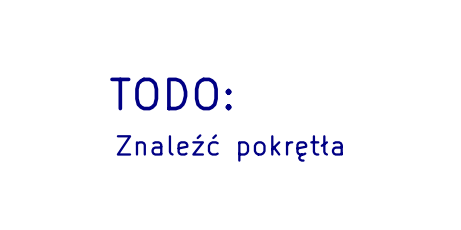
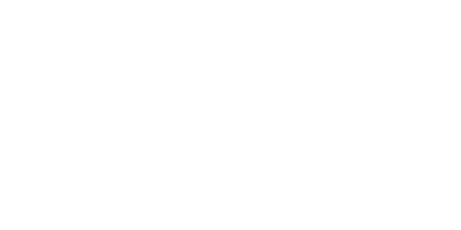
text: TODO: (170, 93) -> none
text: Znaleźć pokrętła (229, 147) -> none

